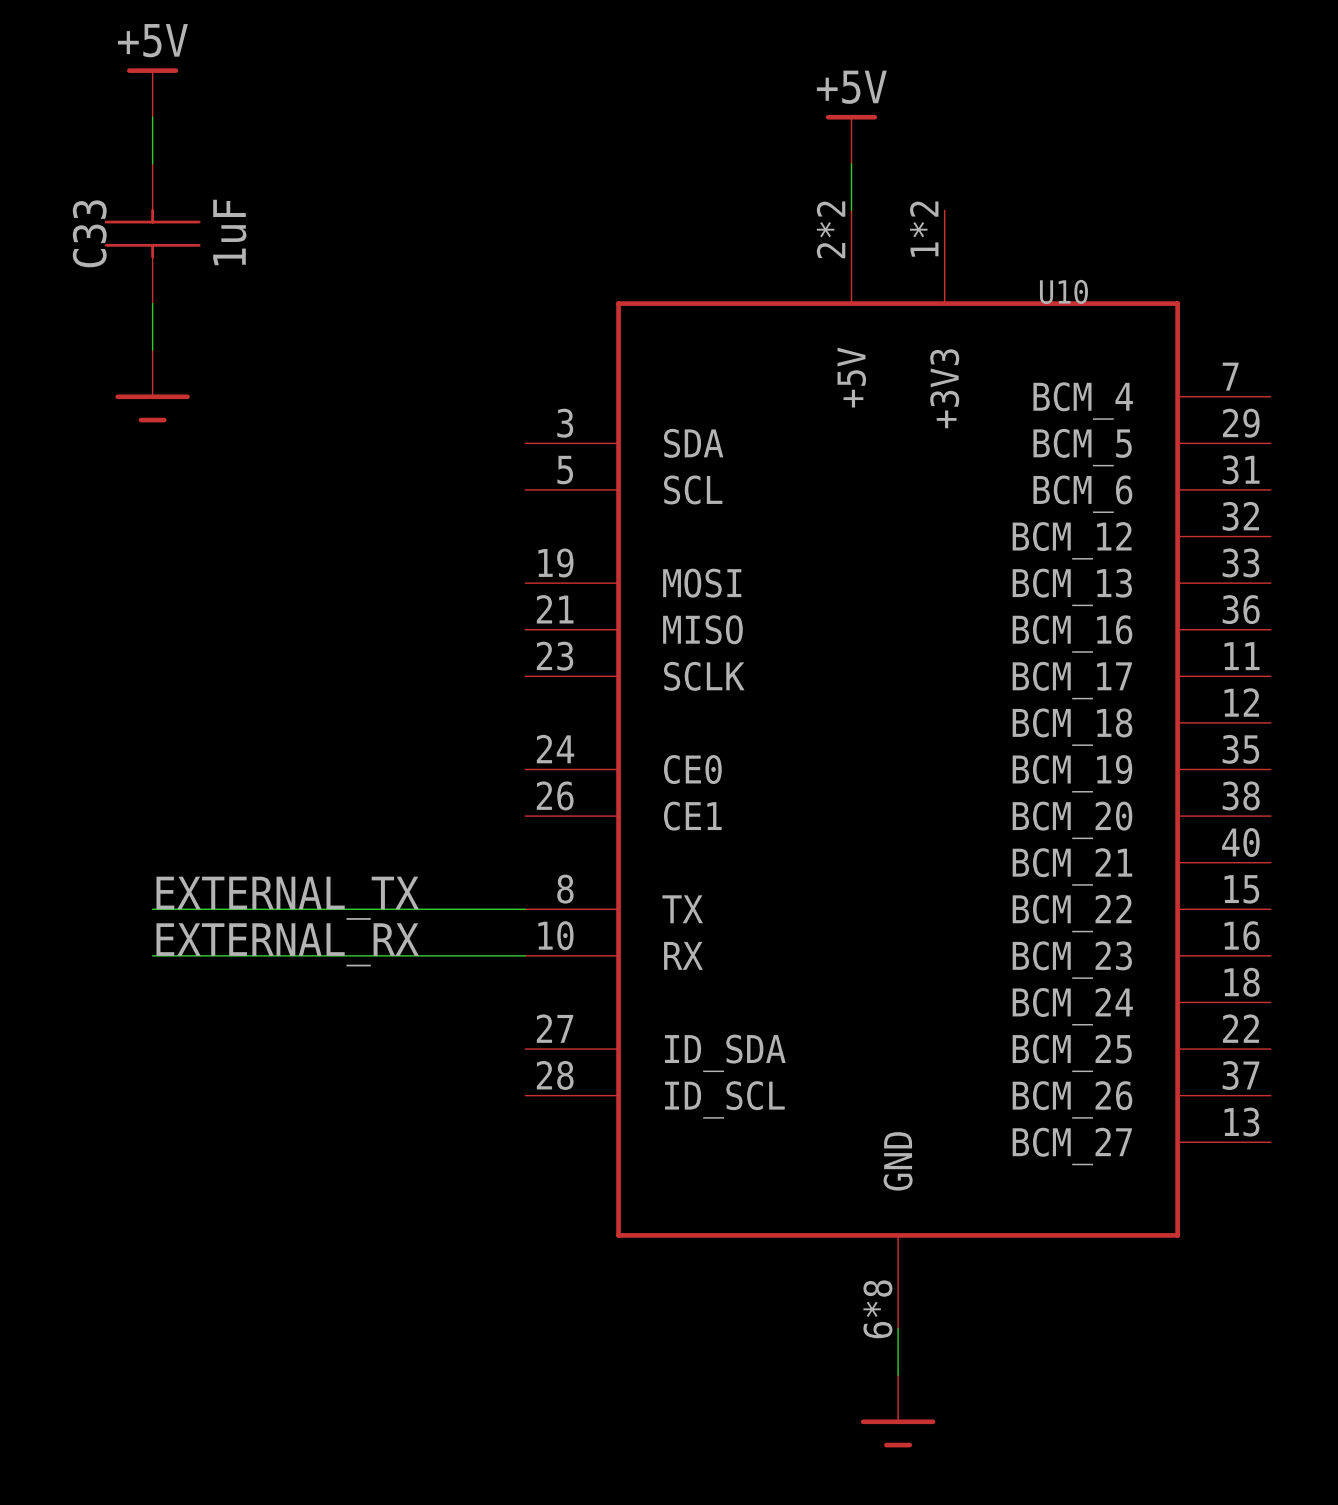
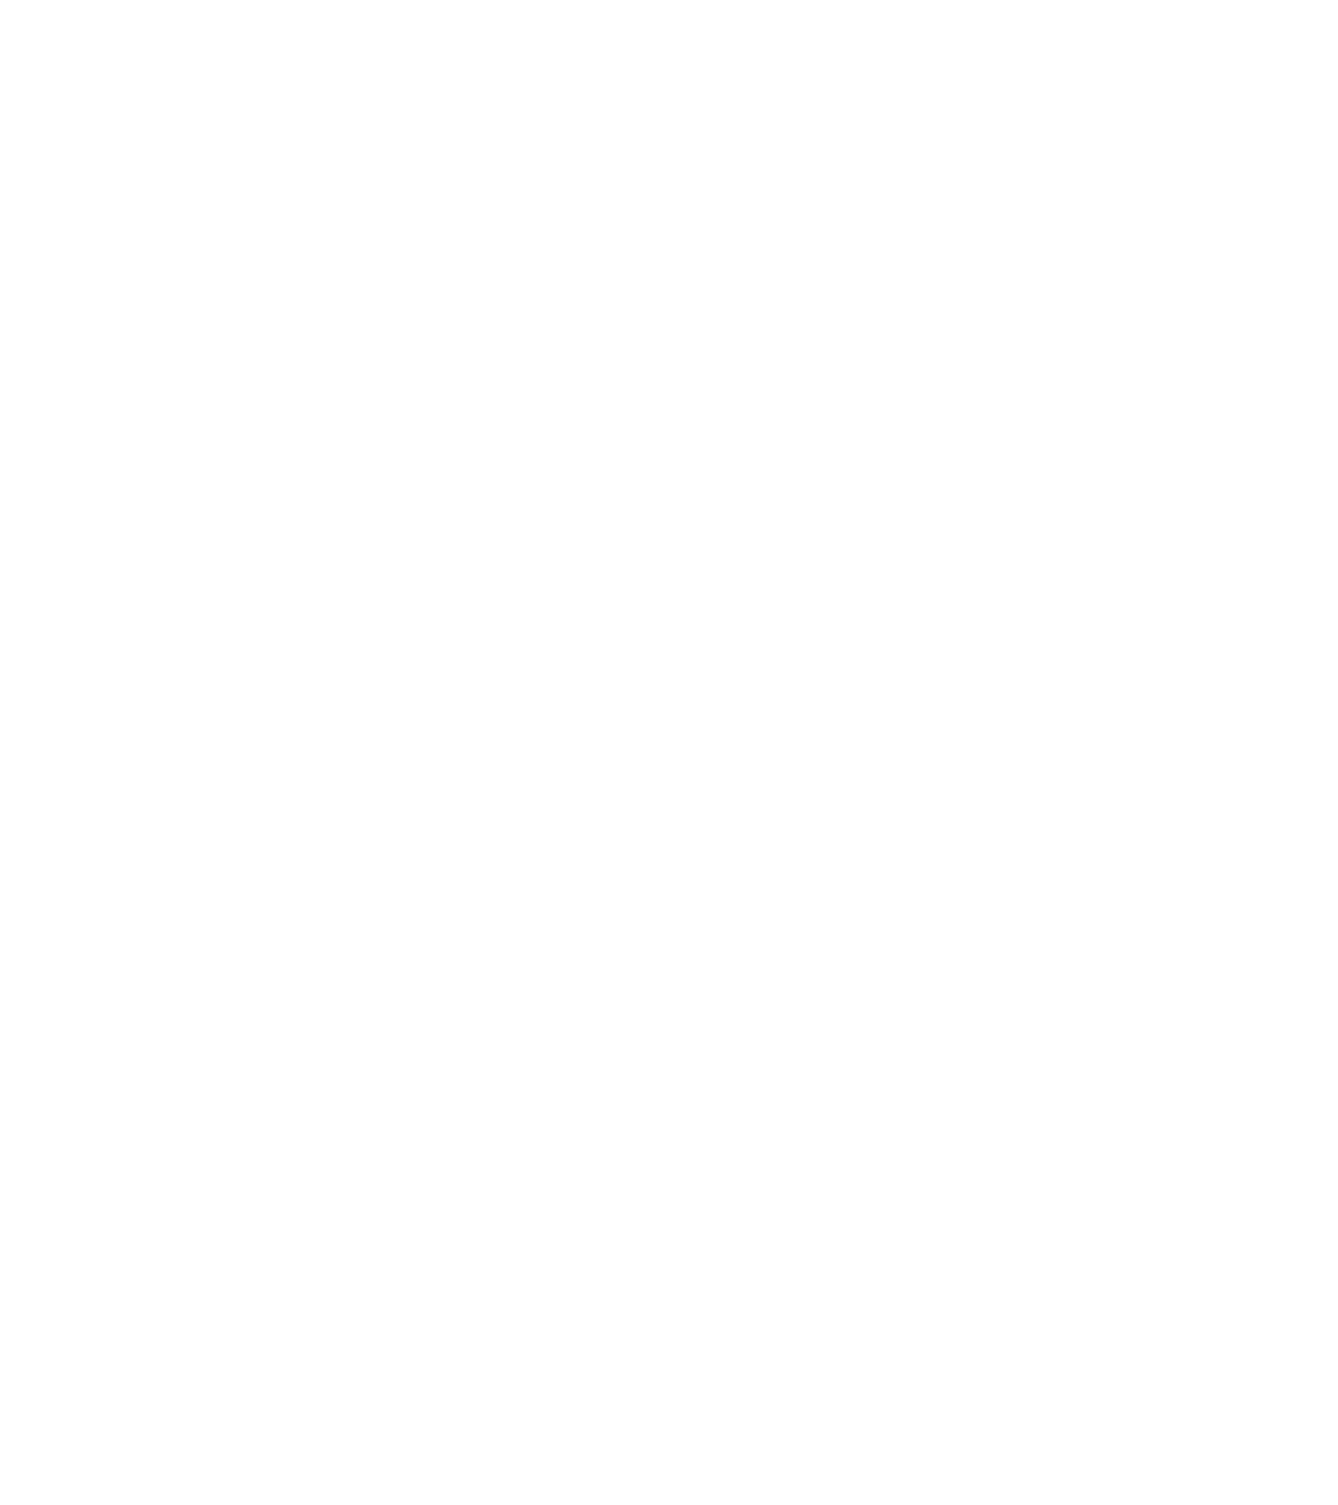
power symbol: +5V (152, 92) -> none
wire: (152, 117) (152, 163) -> none
power symbol: +5V (851, 139) -> none
wire: (851, 163) (851, 210) -> none
C33: 1uF (152, 233) -> none
wire: (152, 303) (152, 350) -> none
power symbol: (152, 386) -> none
U10: (898, 769) -> none
label: EXTERNAL_TX (287, 898) -> none
wire: (152, 909) (525, 909) -> none
label: EXTERNAL_RX (287, 944) -> none
wire: (152, 955) (525, 955) -> none
wire: (898, 1328) (898, 1375) -> none
power symbol: (898, 1411) -> none

